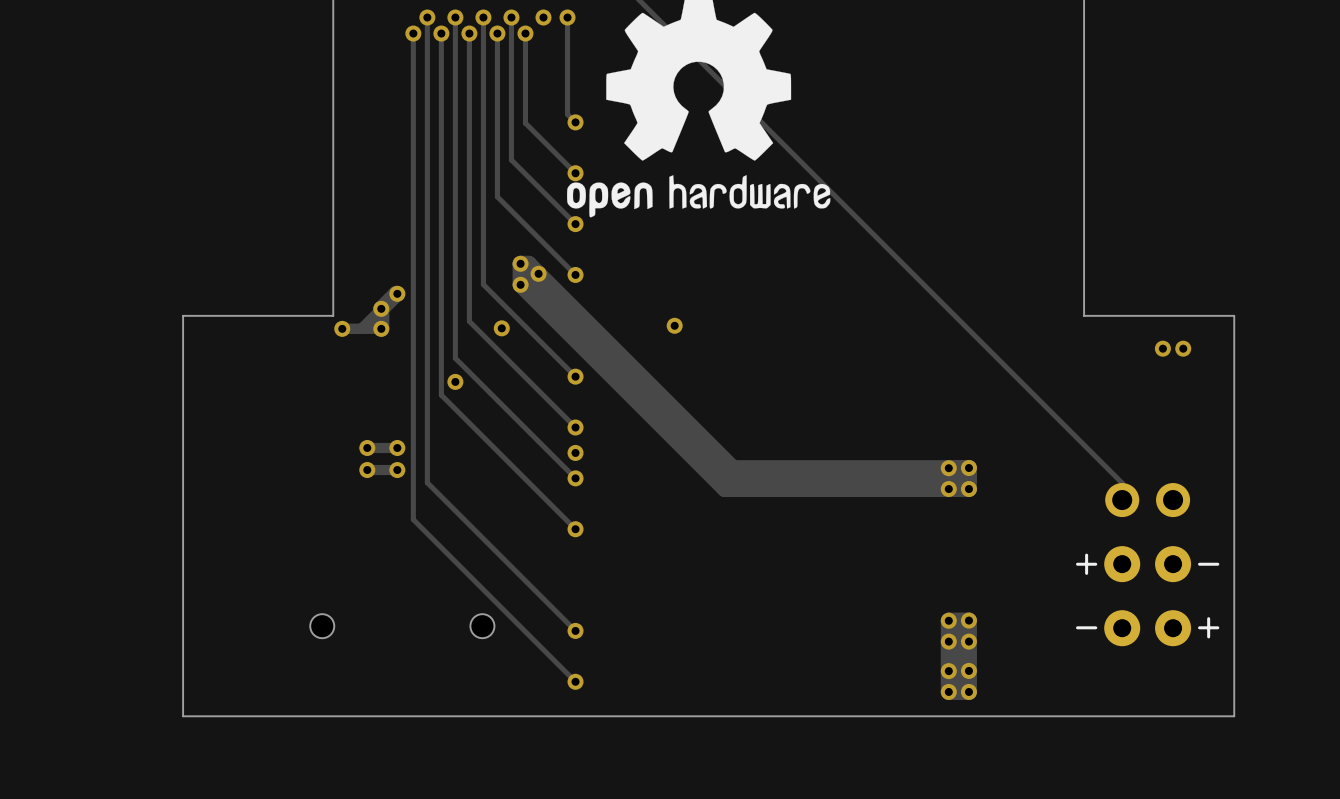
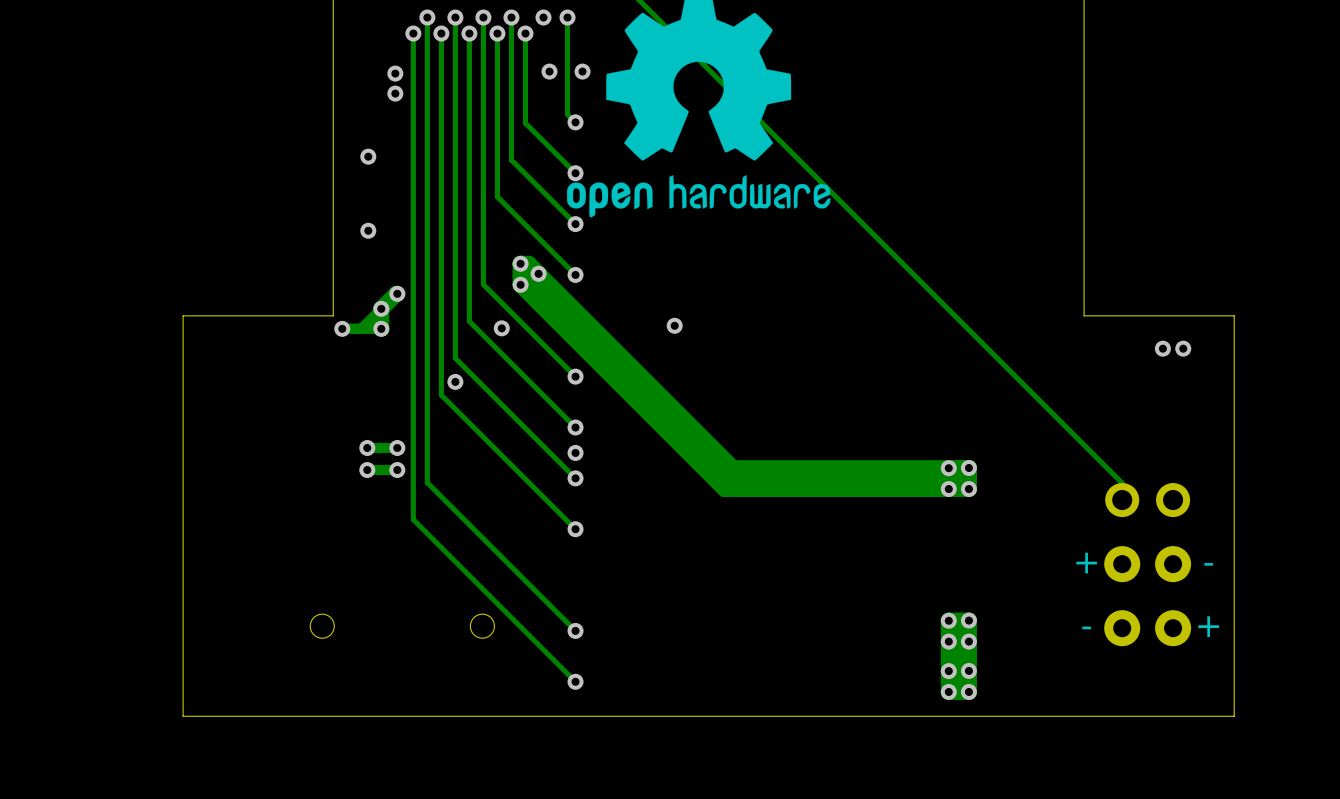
via: none -> (549, 71)
via: none -> (582, 71)
via: none -> (395, 73)
via: none -> (395, 93)
via: none -> (368, 156)
via: none -> (368, 230)

